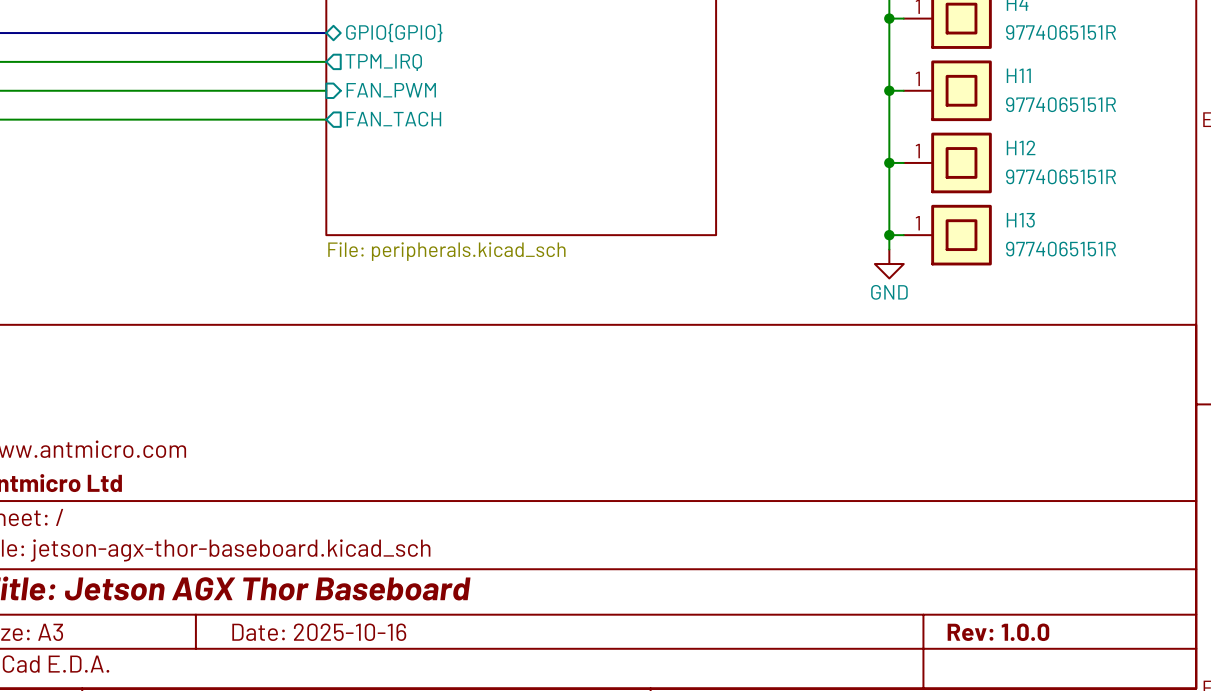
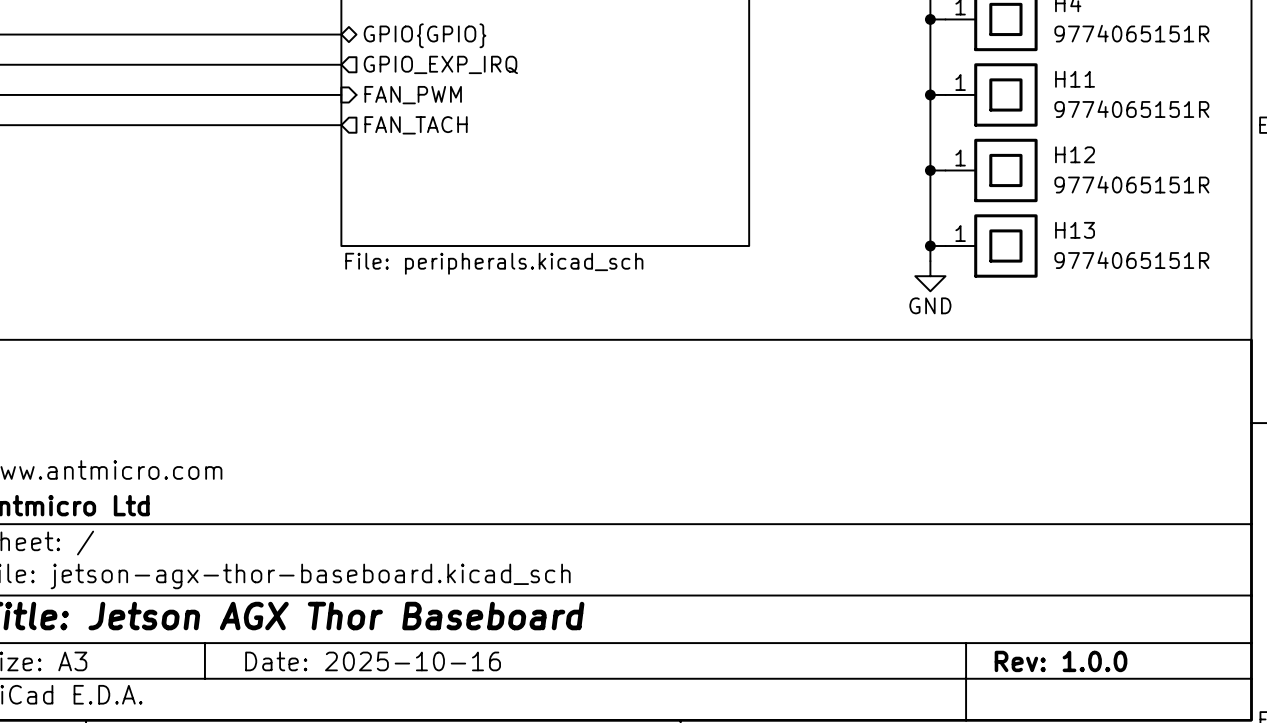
sheet pin: TPM_IRQ (383, 62) -> GPIO_EXP_IRQ (440, 64)

